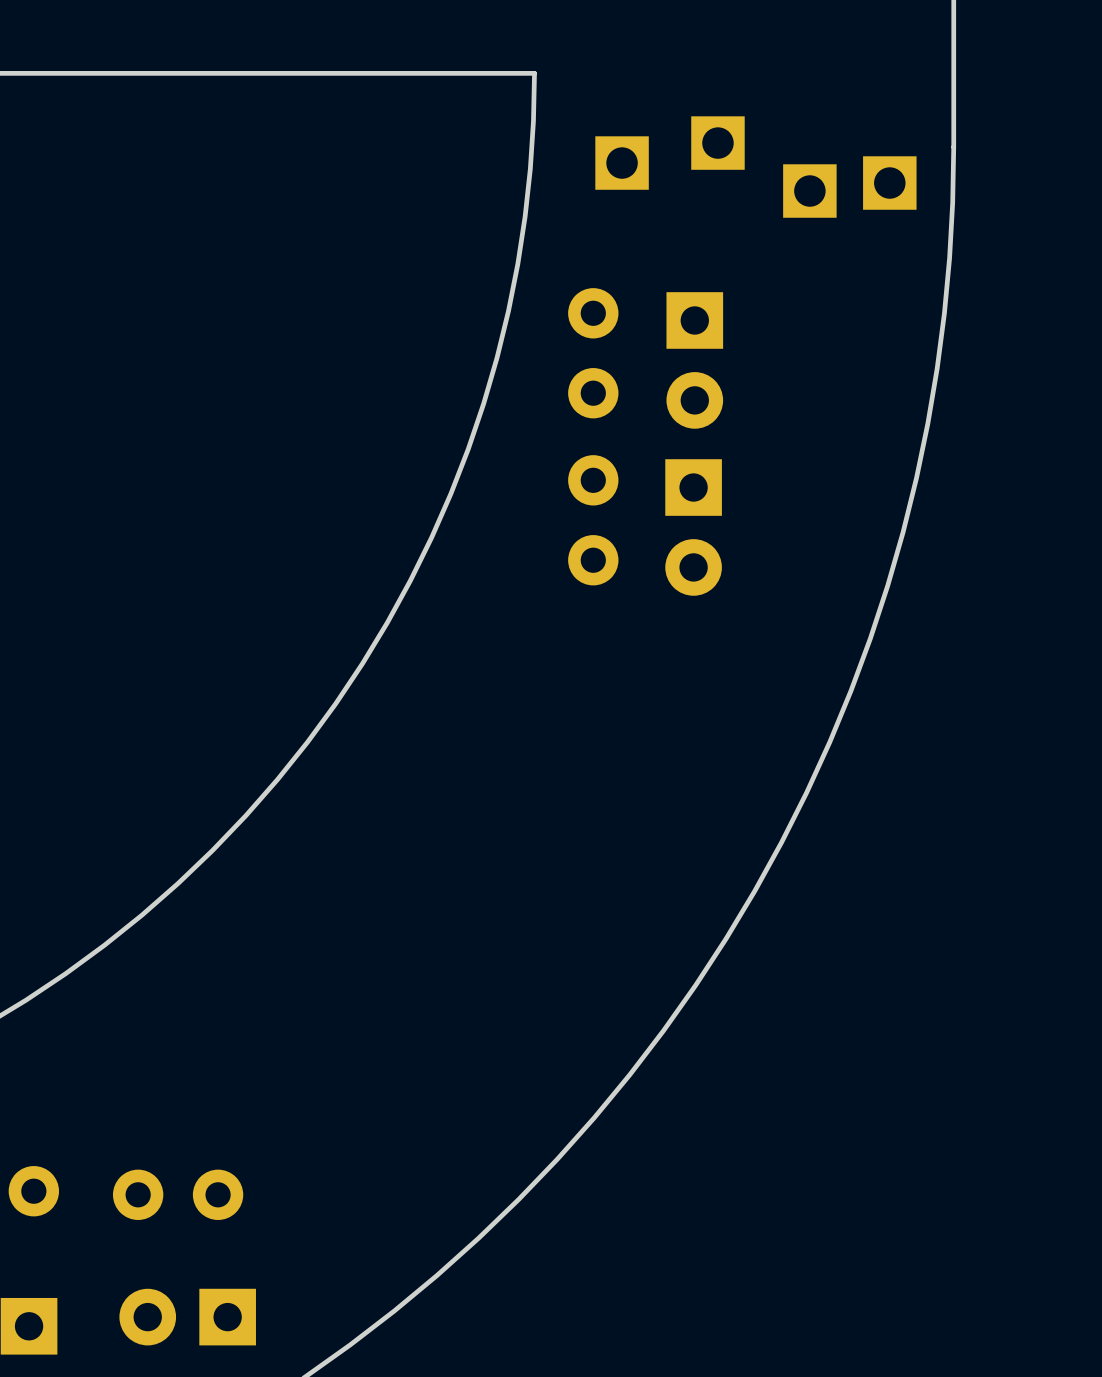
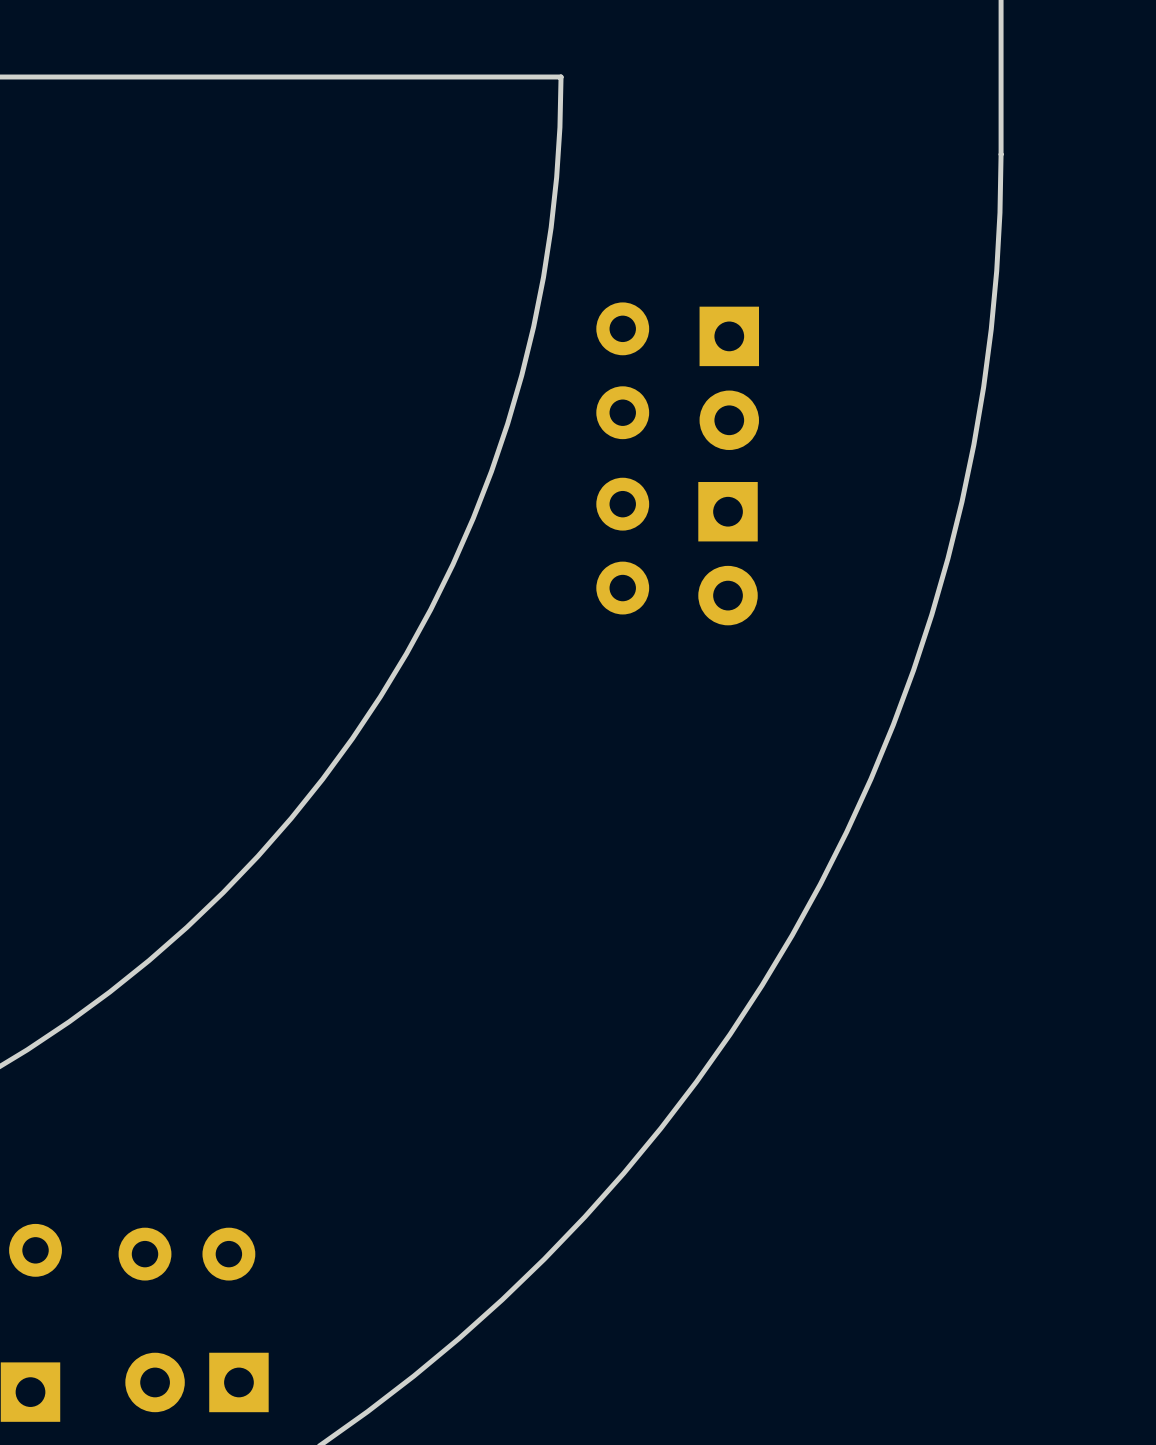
part: (717, 143) -> none
part: (622, 163) -> none
part: (889, 183) -> none
part: (809, 191) -> none

